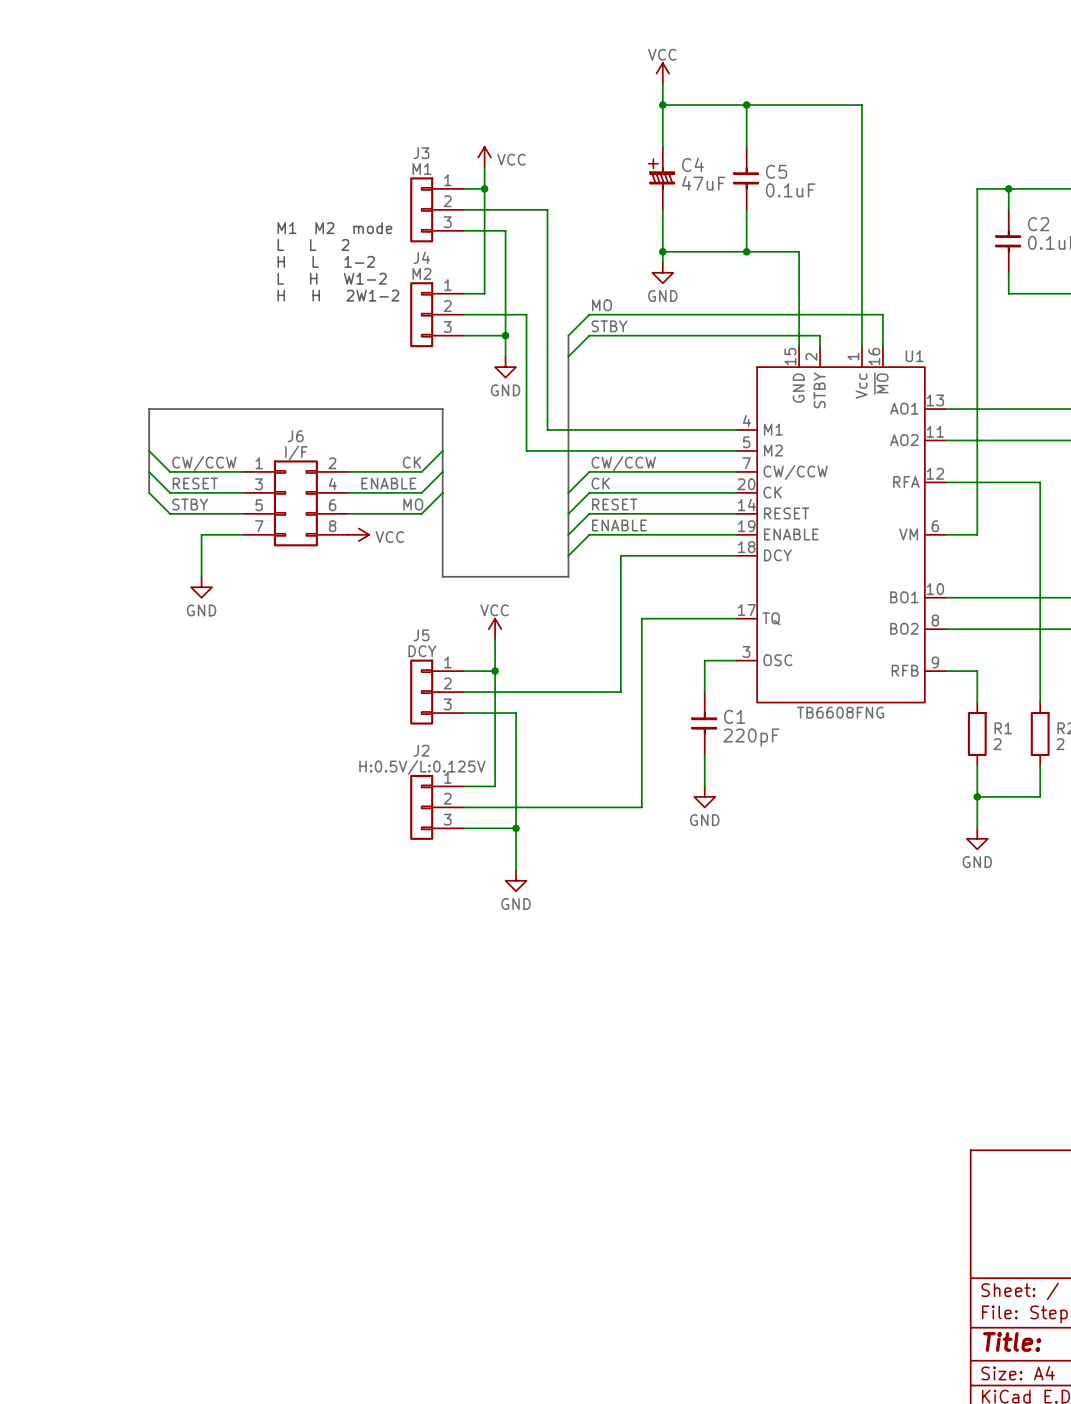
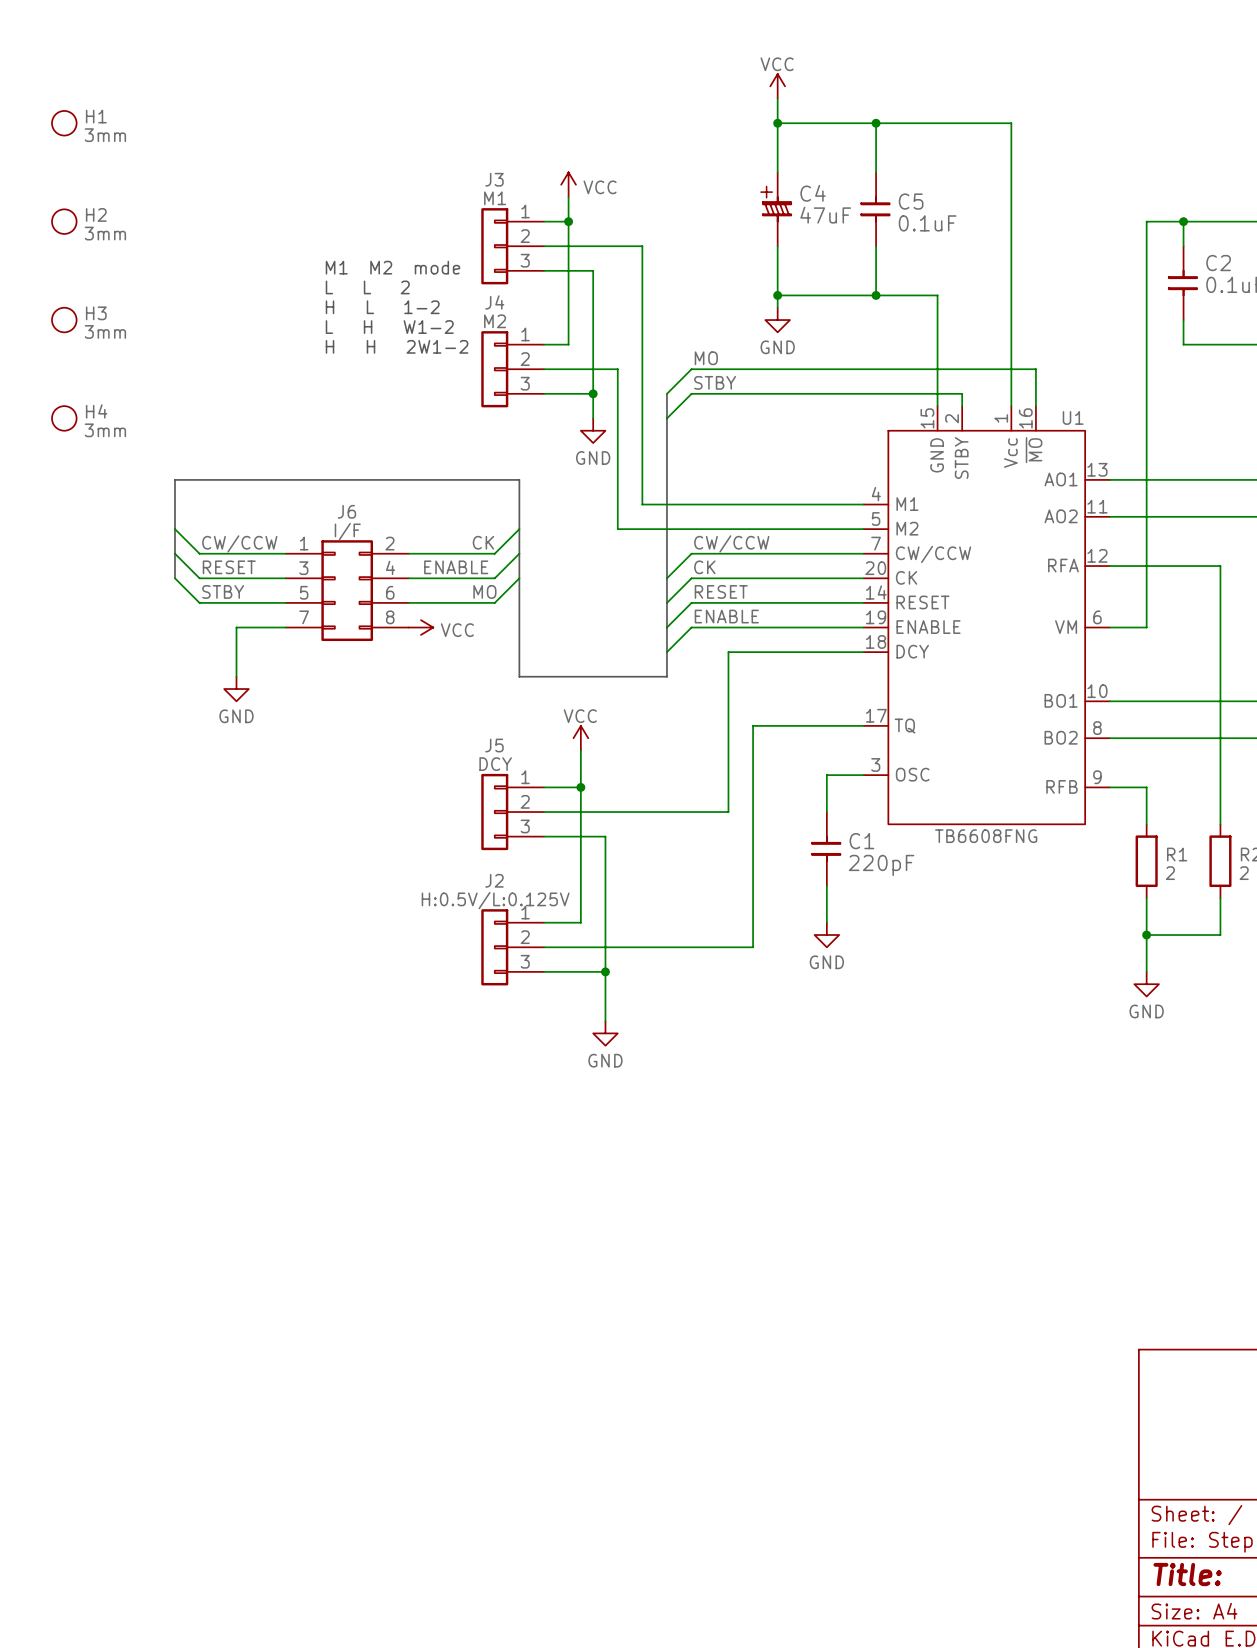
H1: none -> 3mm (64, 123)
H2: none -> 3mm (64, 221)
H3: none -> 3mm (64, 320)
H4: none -> 3mm (64, 418)

